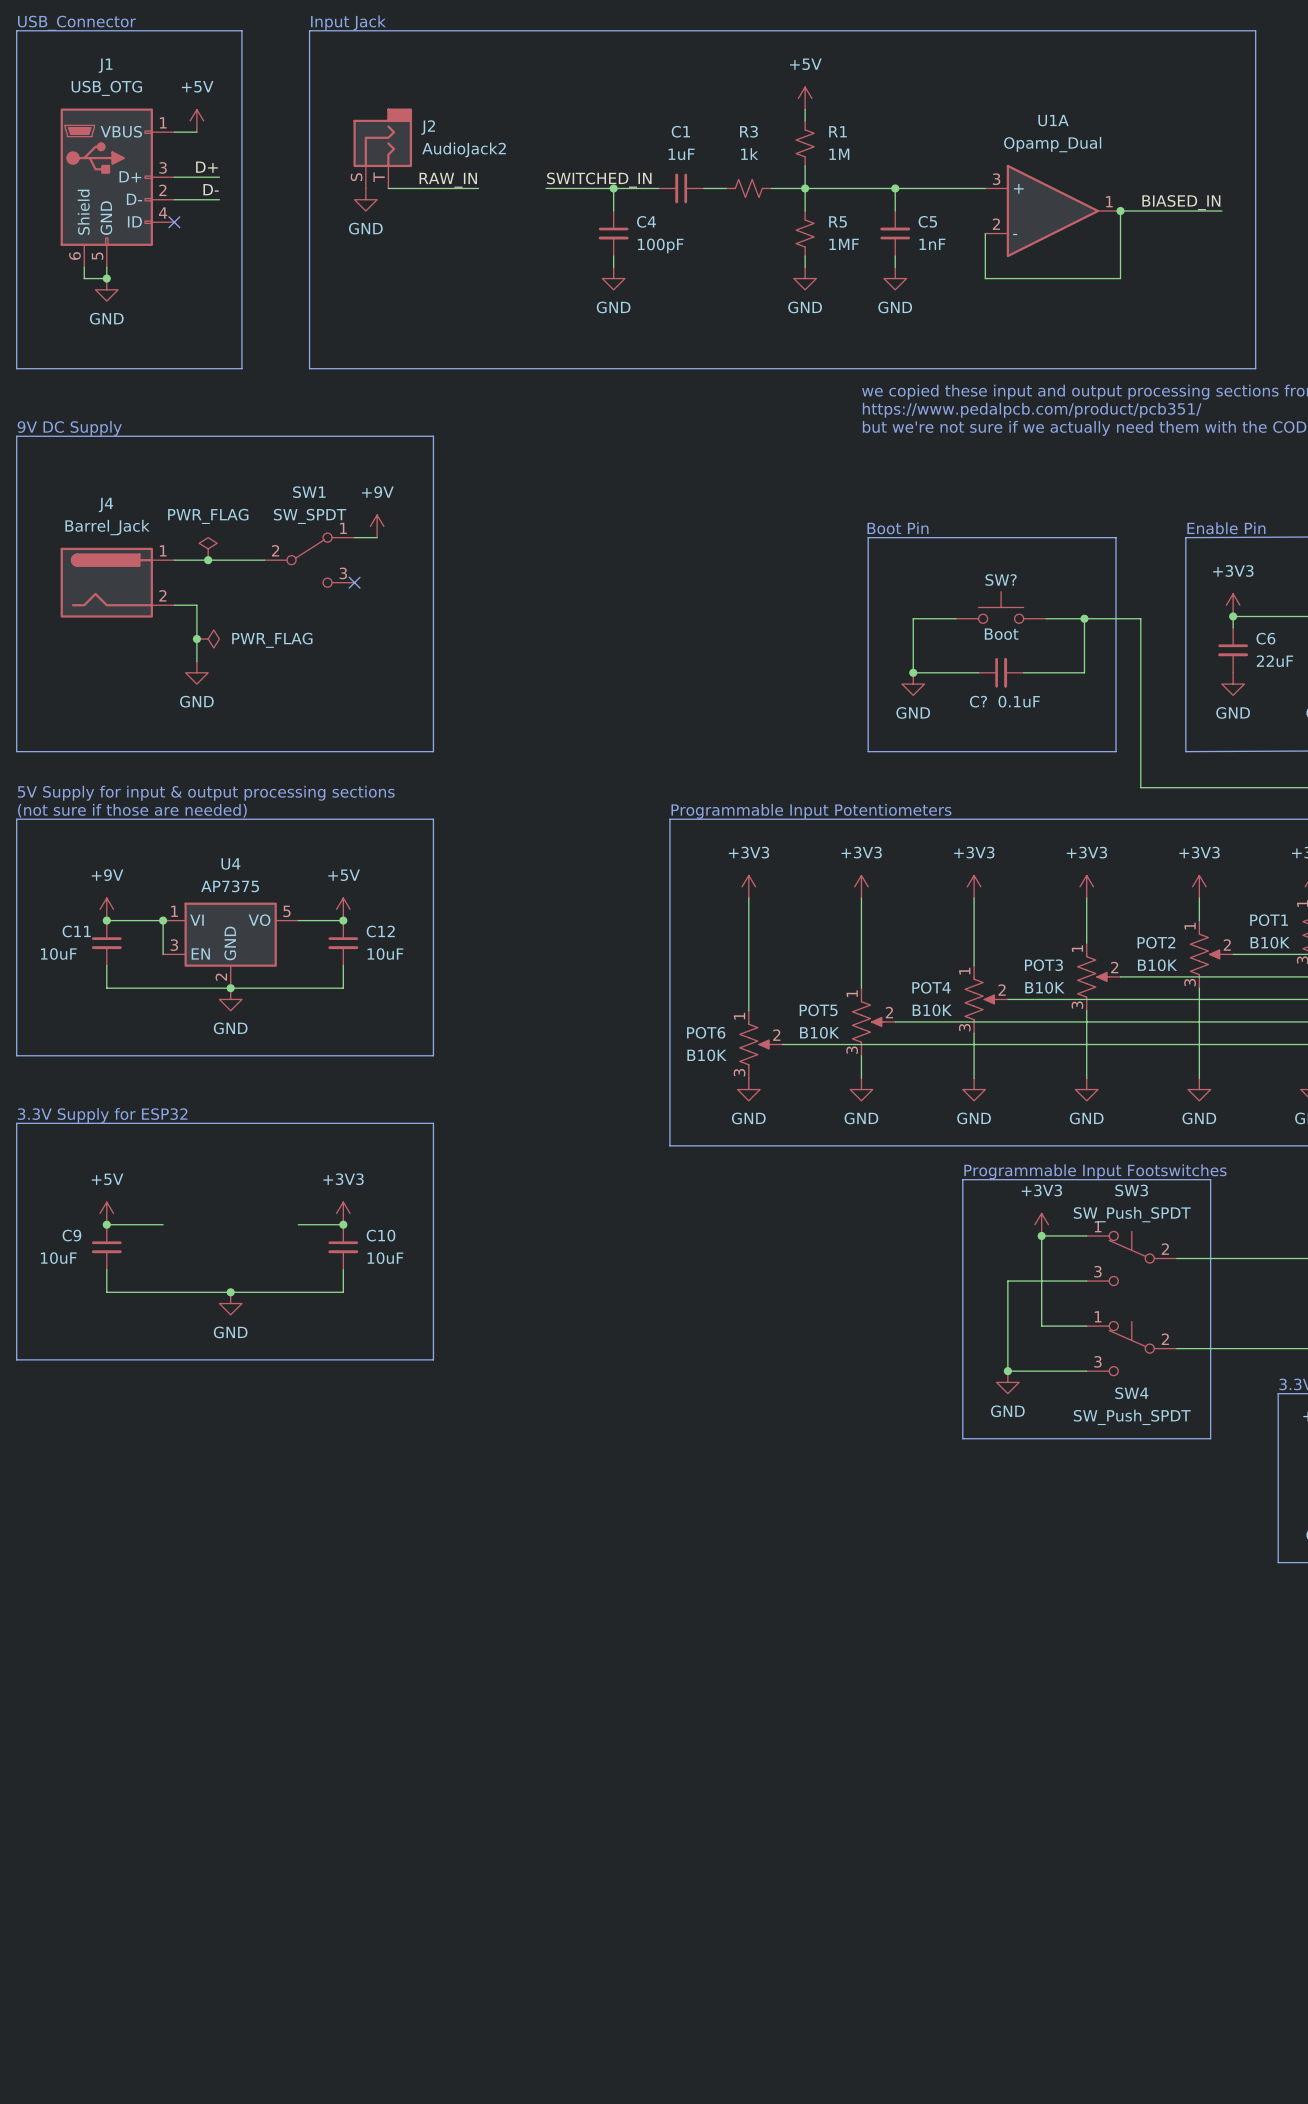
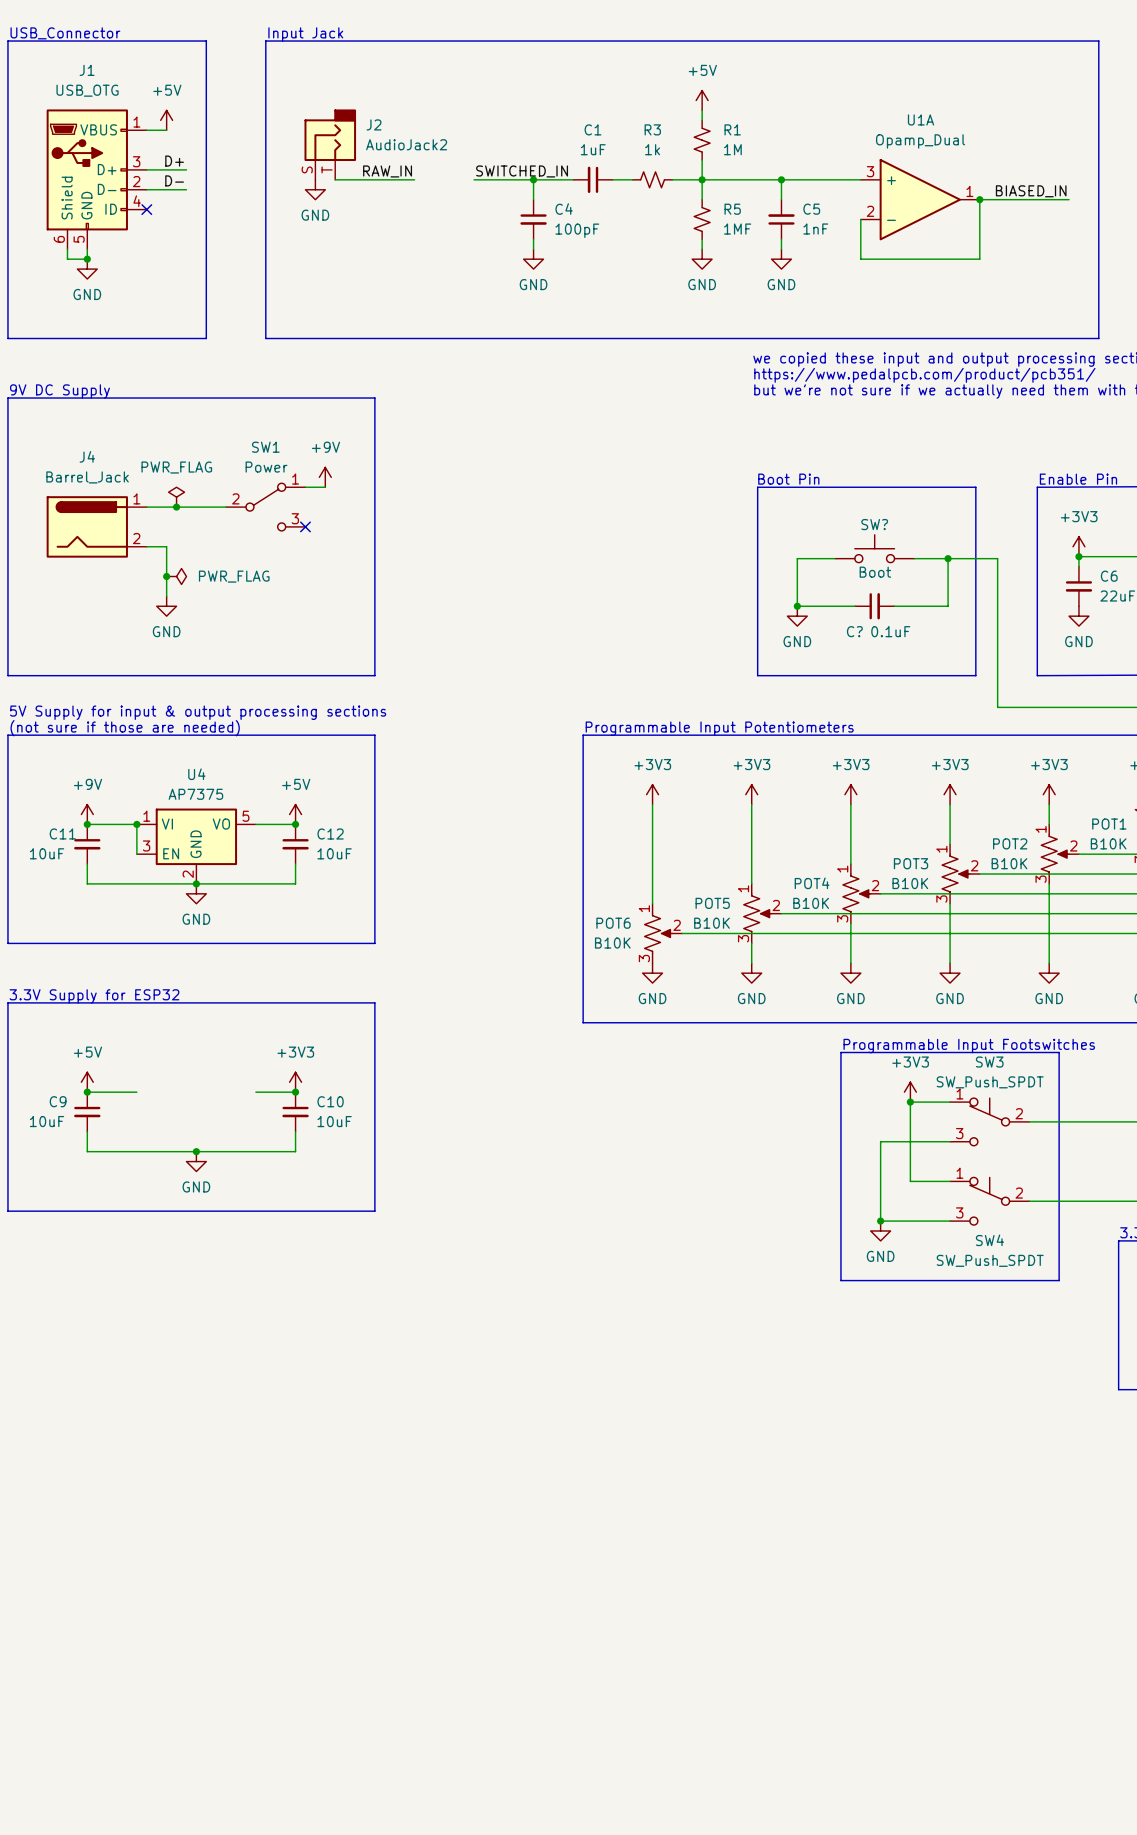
SW1 value: SW_SPDT (310, 516) -> Power (266, 467)

